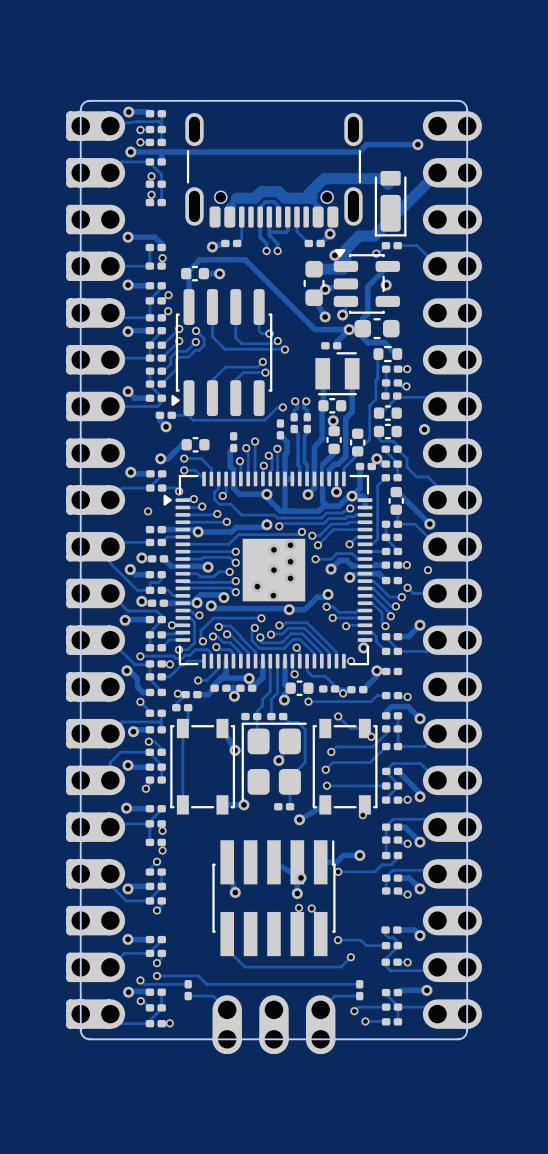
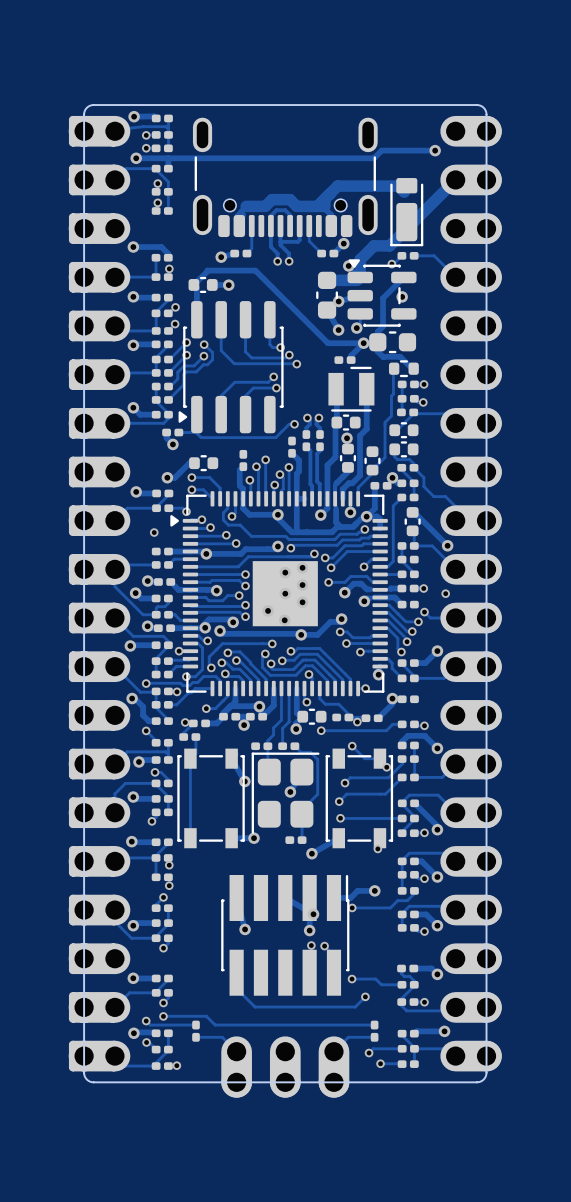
via: (424, 429) -> none

